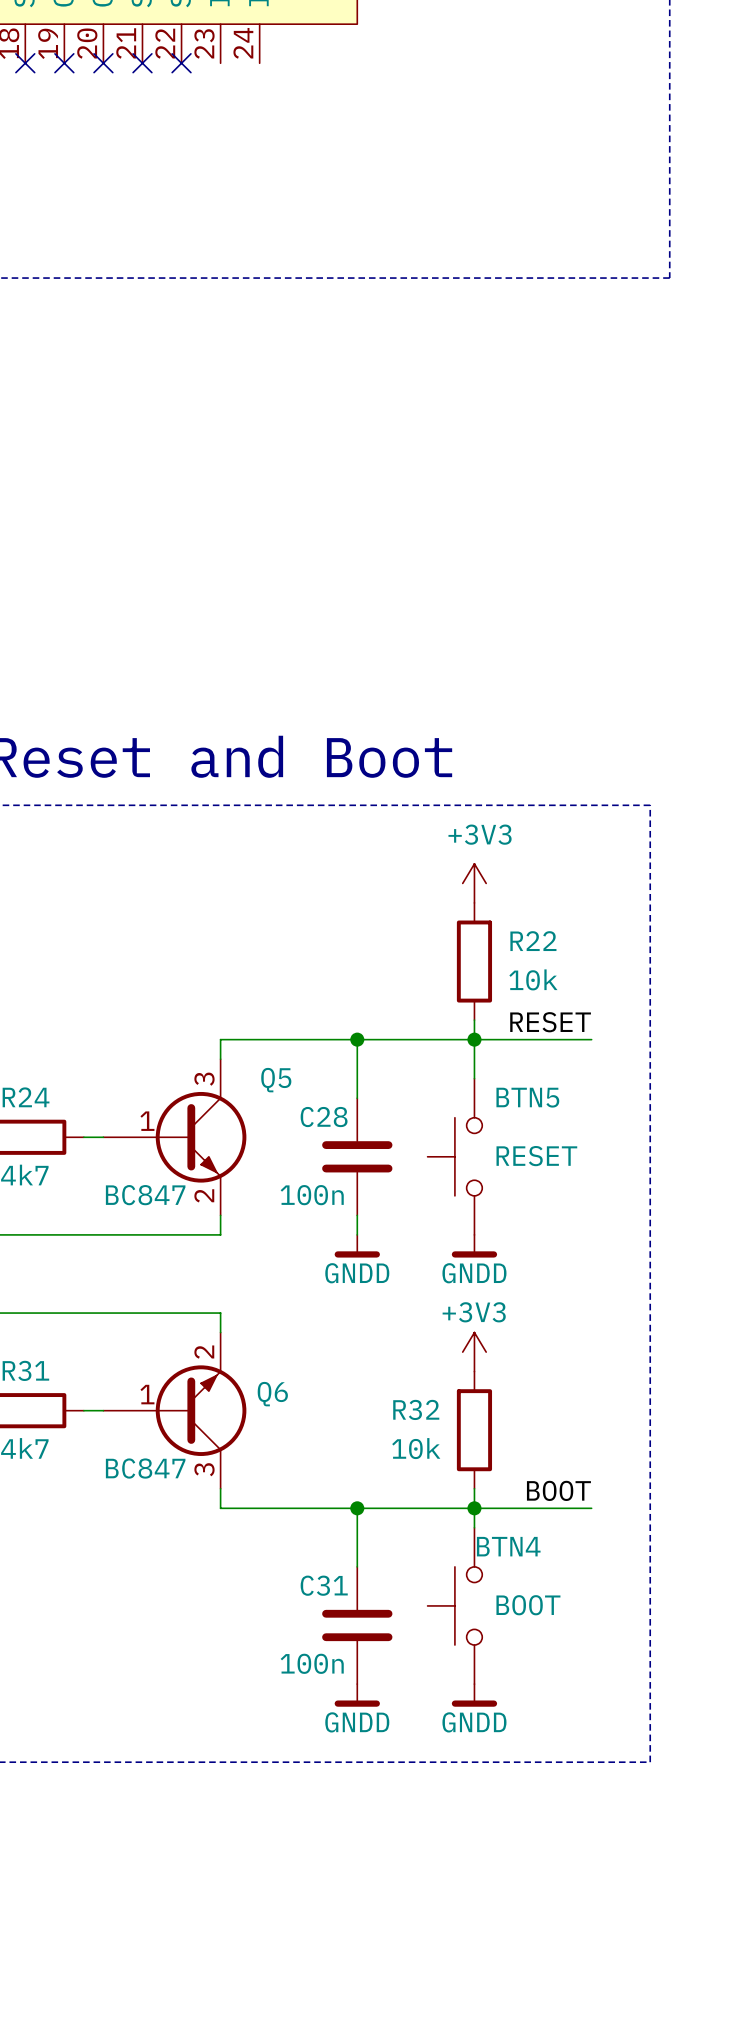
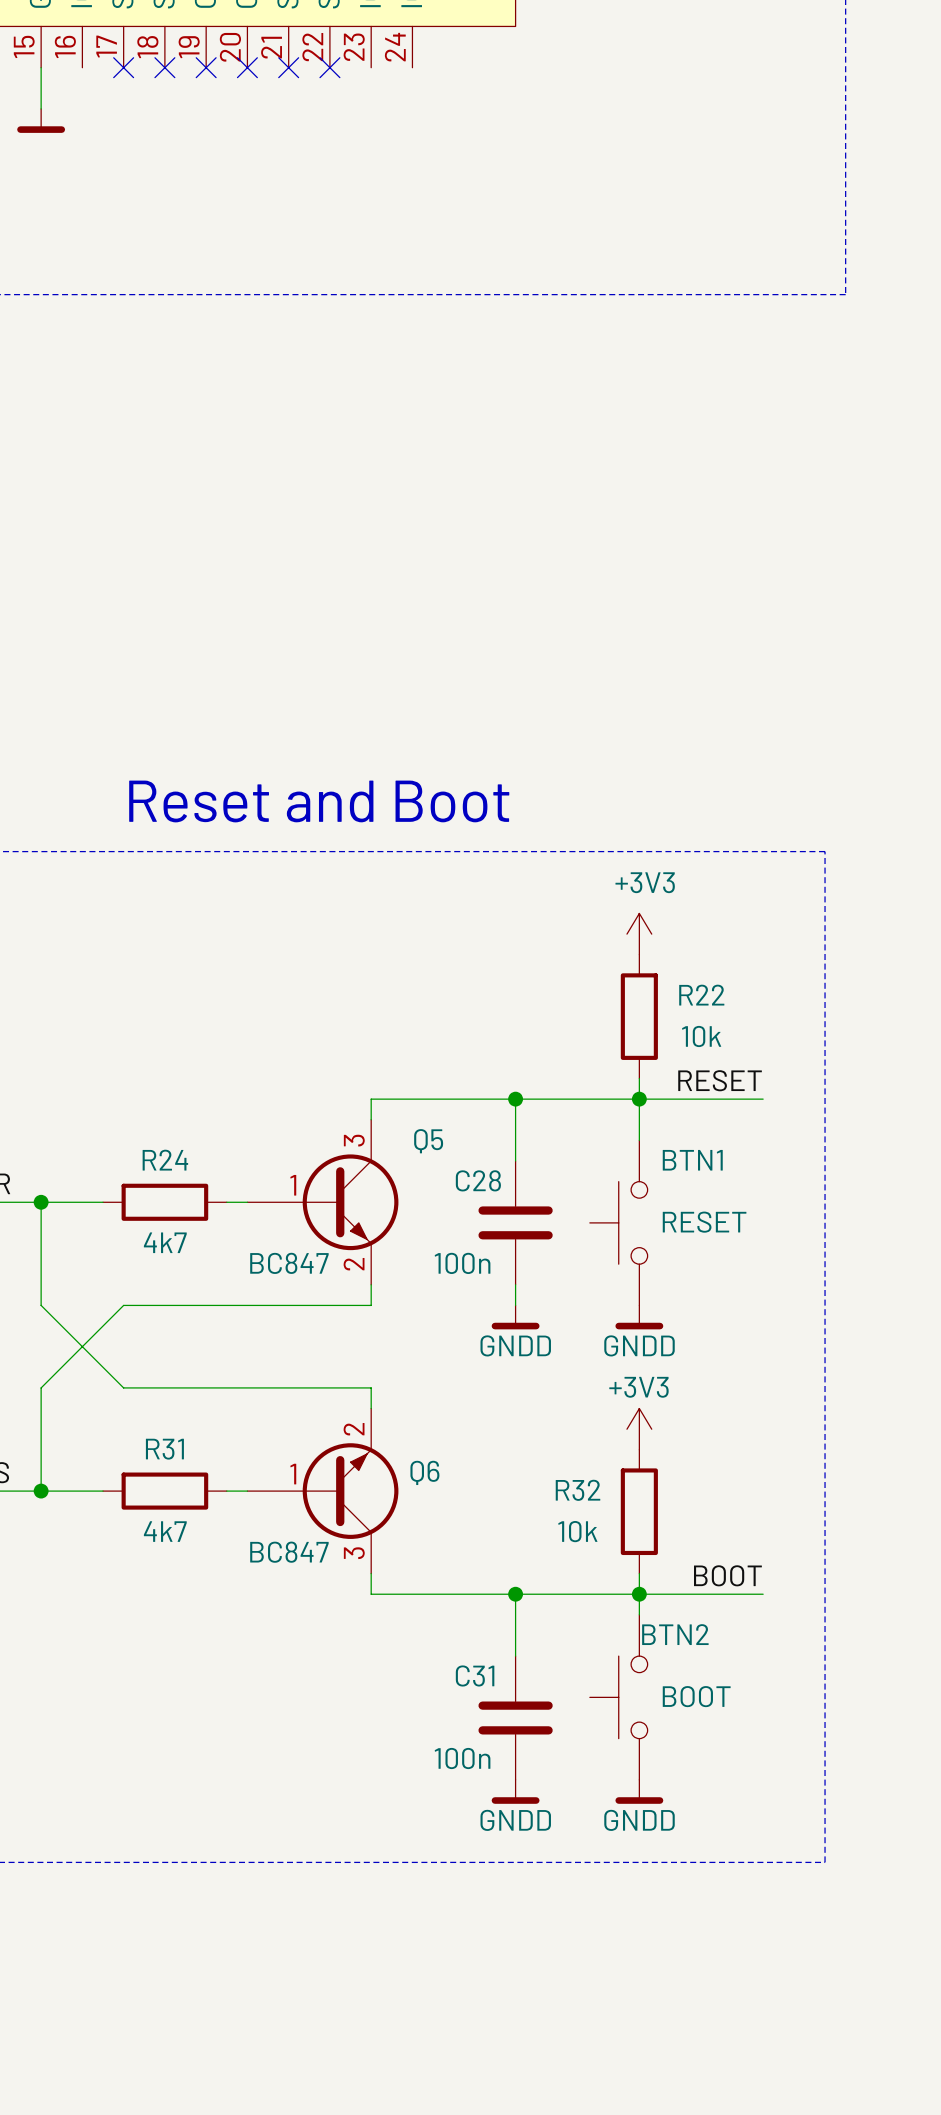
BTN5 name: BTN5 (527, 1097) -> BTN1 (692, 1160)
BTN4 name: BTN4 (508, 1546) -> BTN2 (675, 1634)

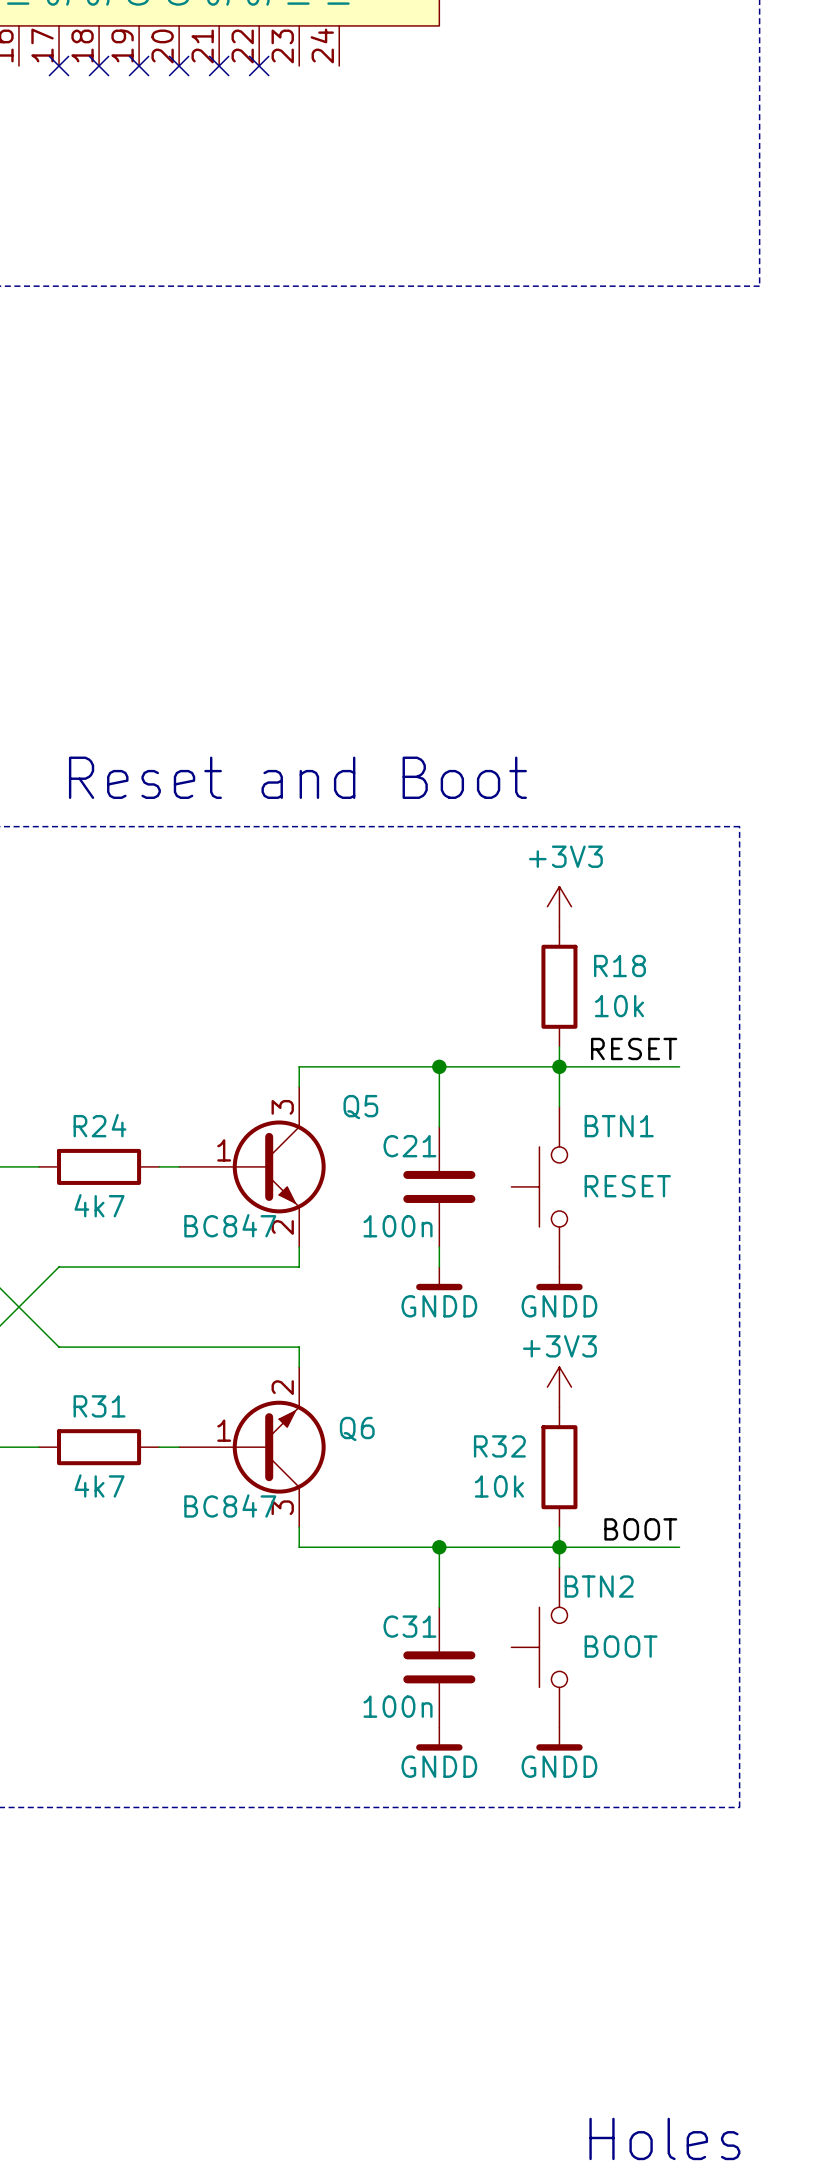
R22 name: R22 (701, 995) -> R18 (619, 966)
C28 name: C28 (478, 1180) -> C21 (409, 1146)

